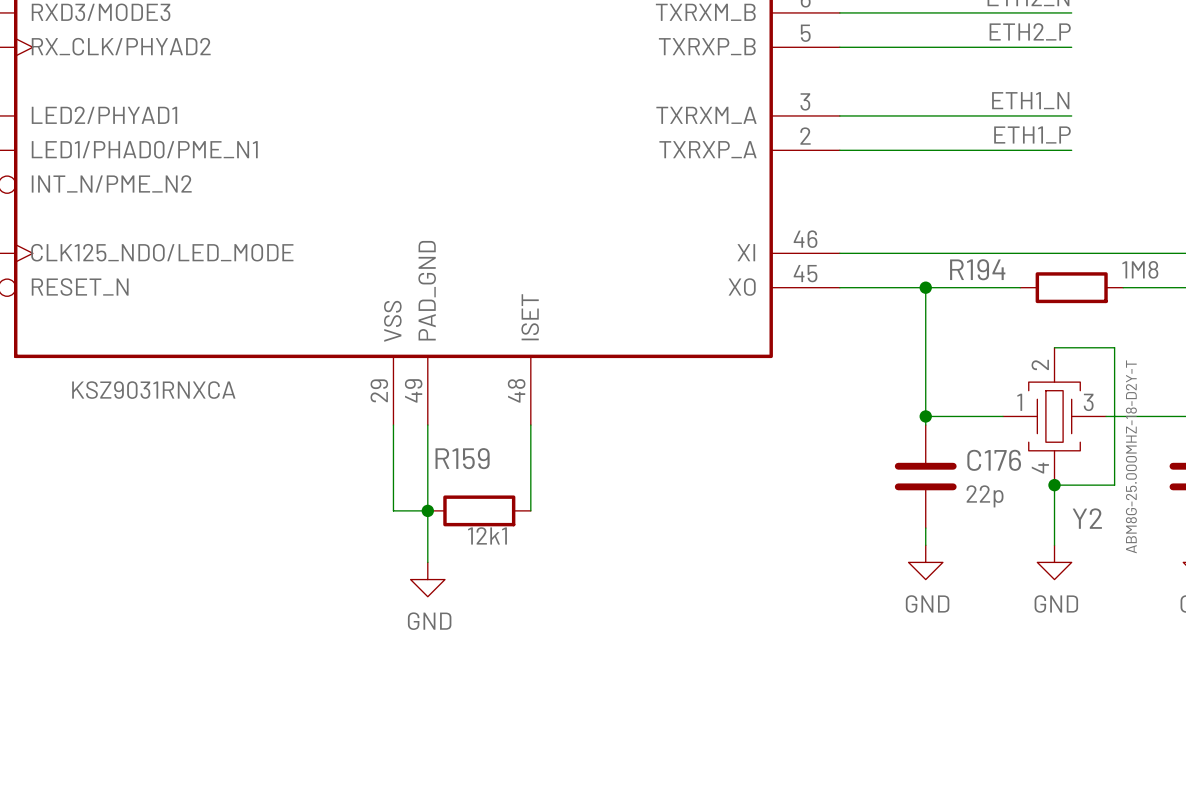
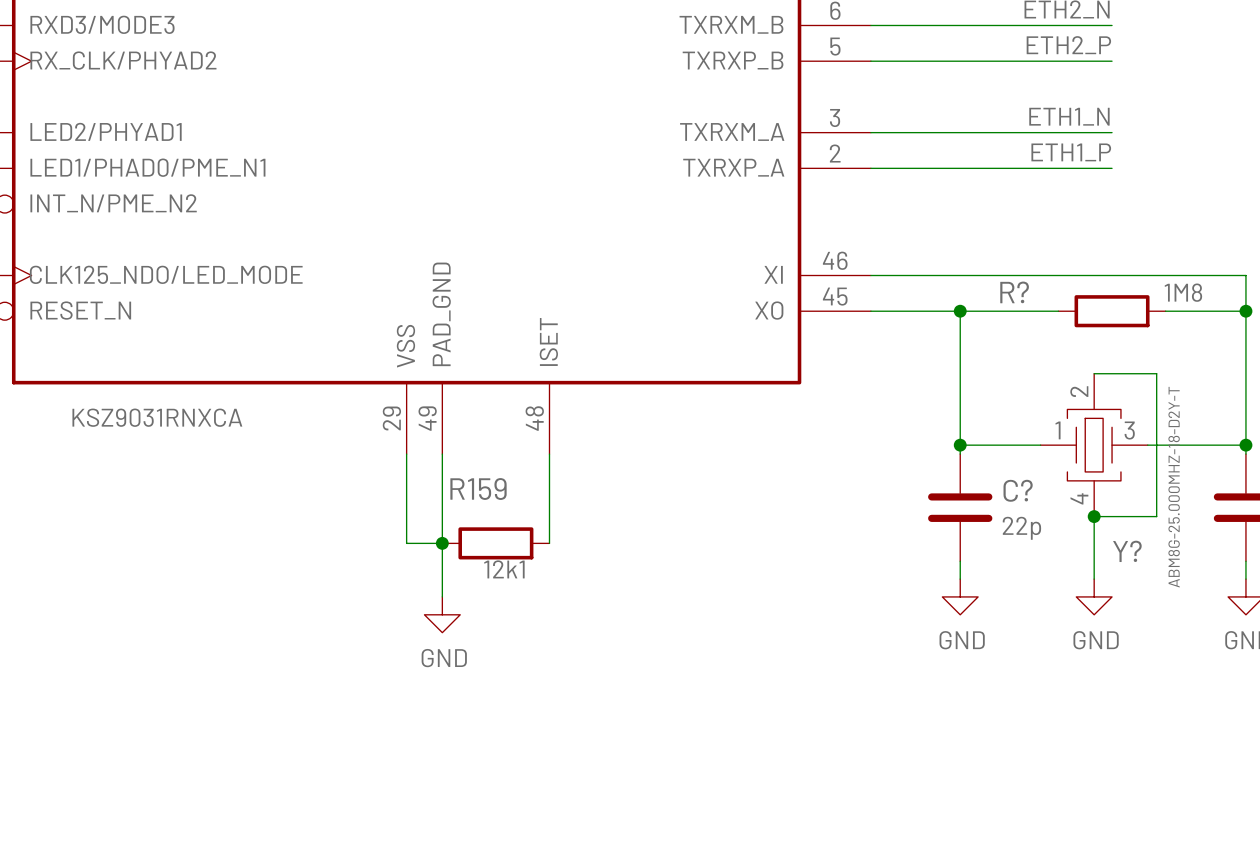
R194 name: R194 (977, 269) -> R? (1014, 292)
C176 name: C176 (994, 460) -> C? (1018, 490)
Y2 name: Y2 (1087, 518) -> Y? (1127, 551)

